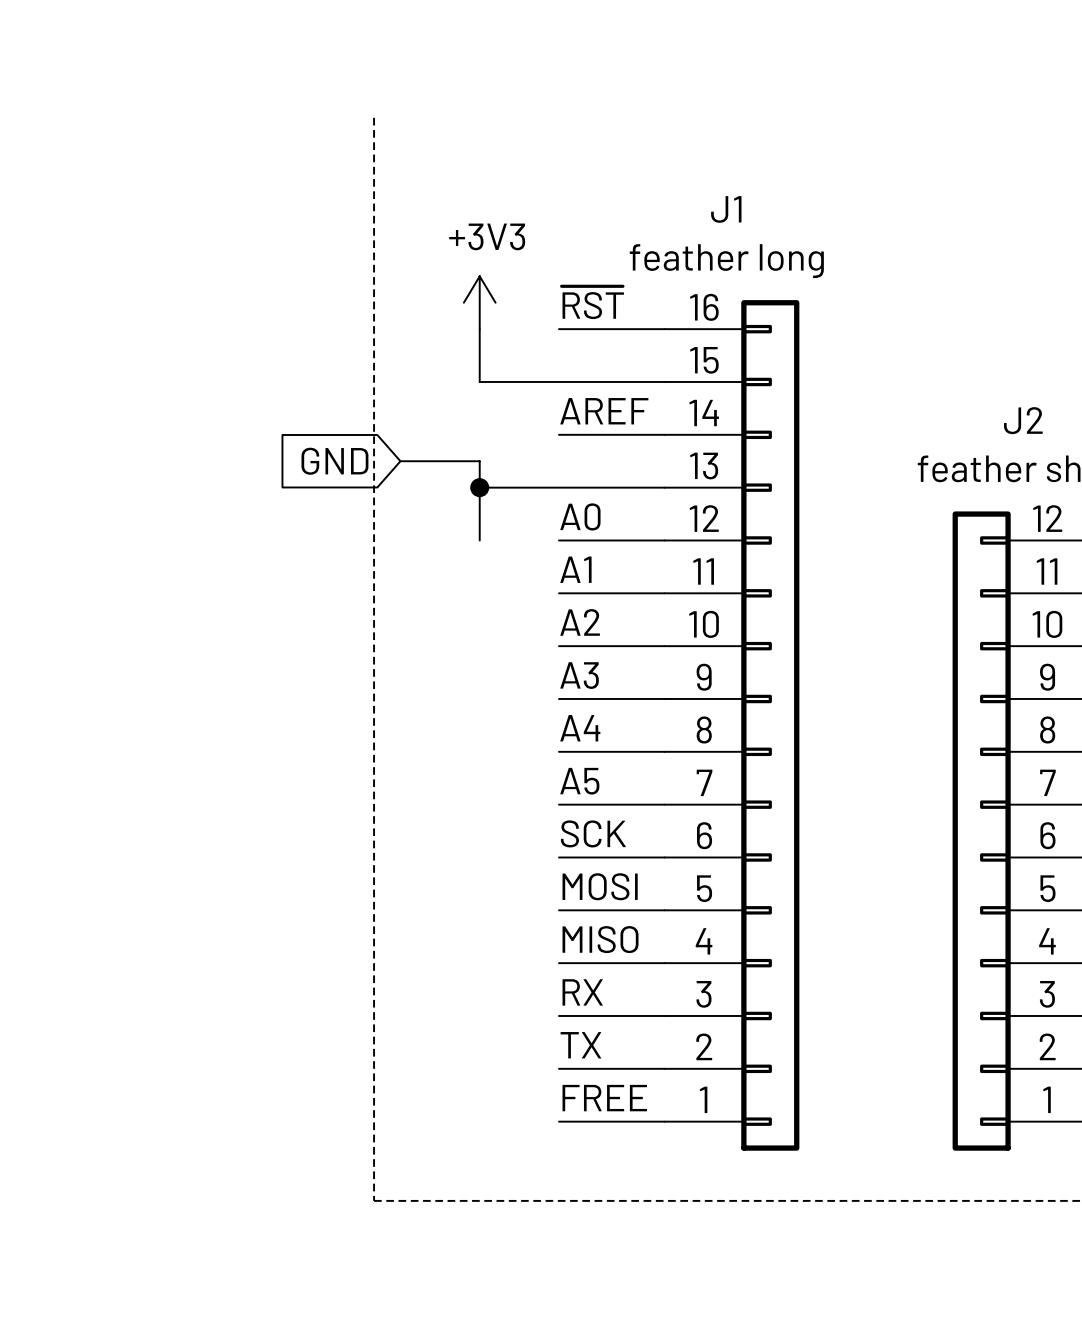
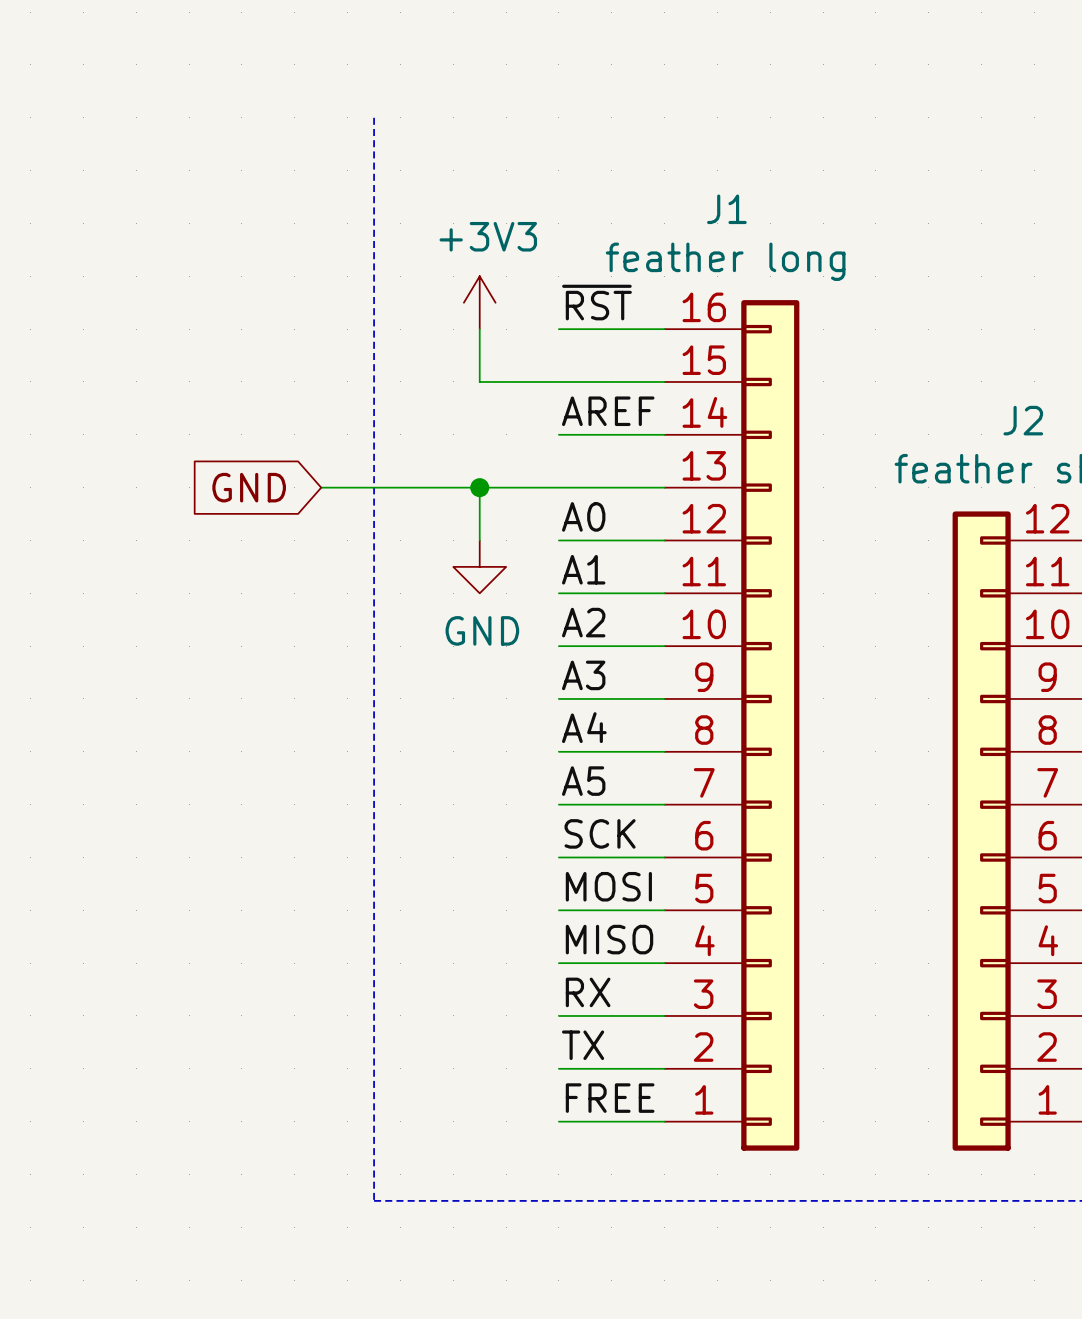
global label position: GND (334, 461) -> GND (249, 487)
wire: (400, 461) (479, 461) (479, 487) -> (321, 487) (479, 487)
power symbol: none -> GND (479, 566)

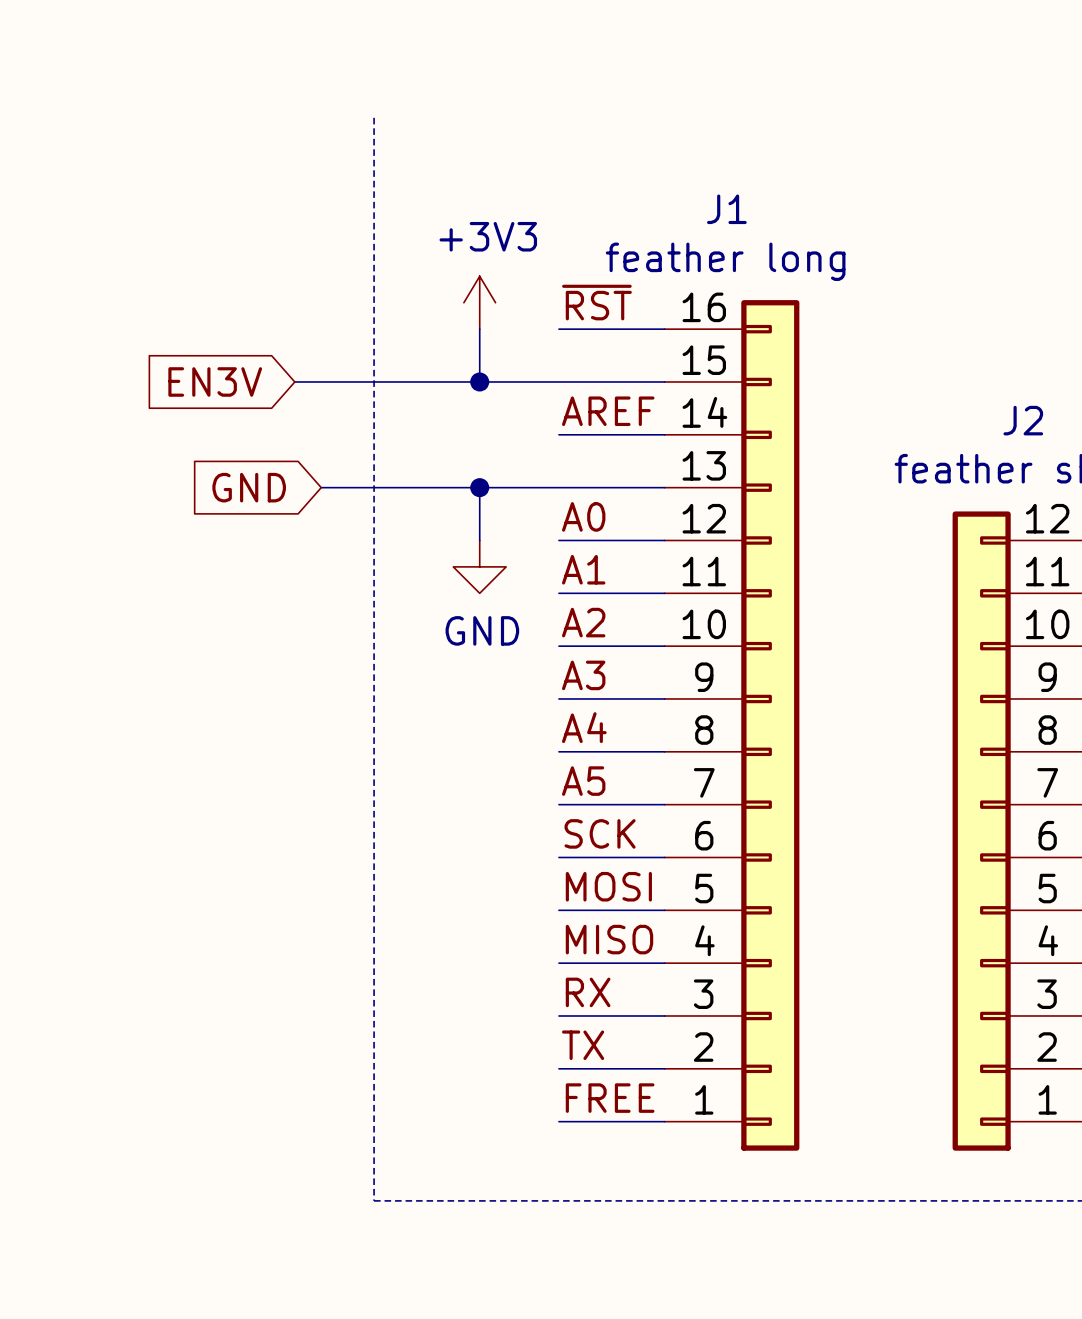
global label: none -> EN3V (215, 381)
wire: none -> (294, 381) (479, 381)
junction: none -> (479, 381)

